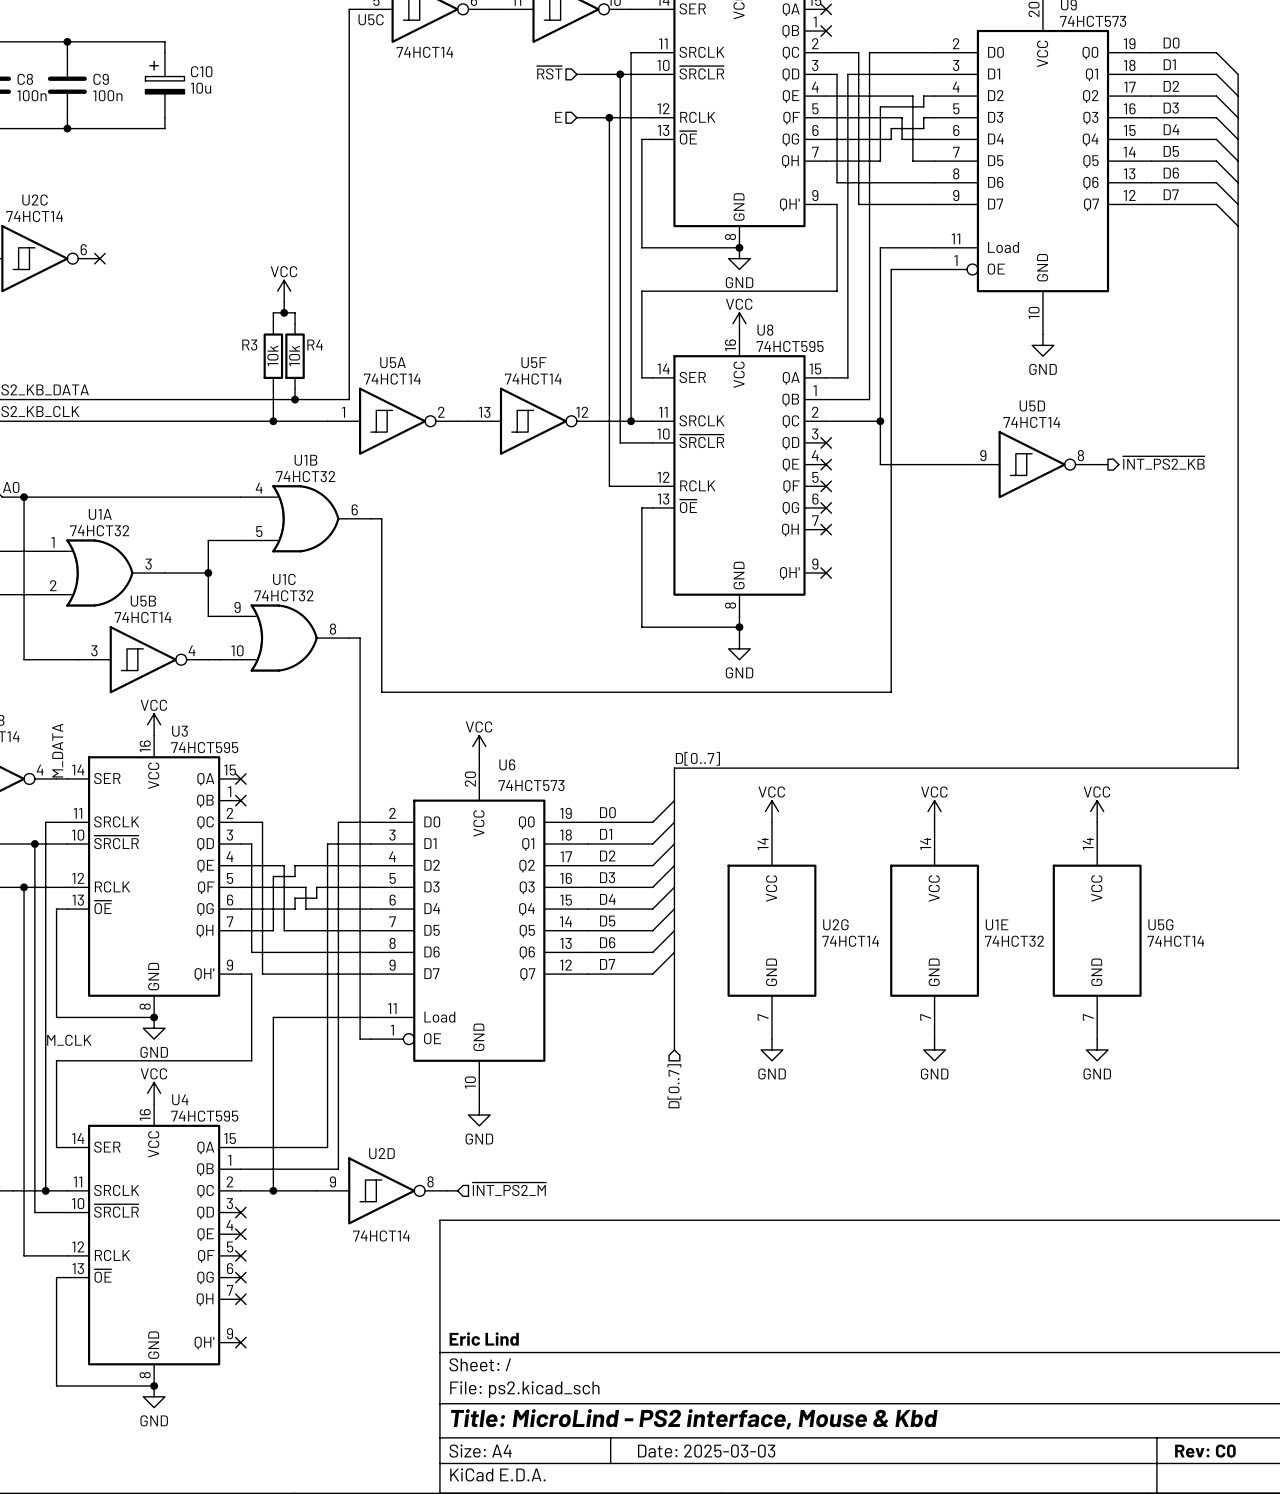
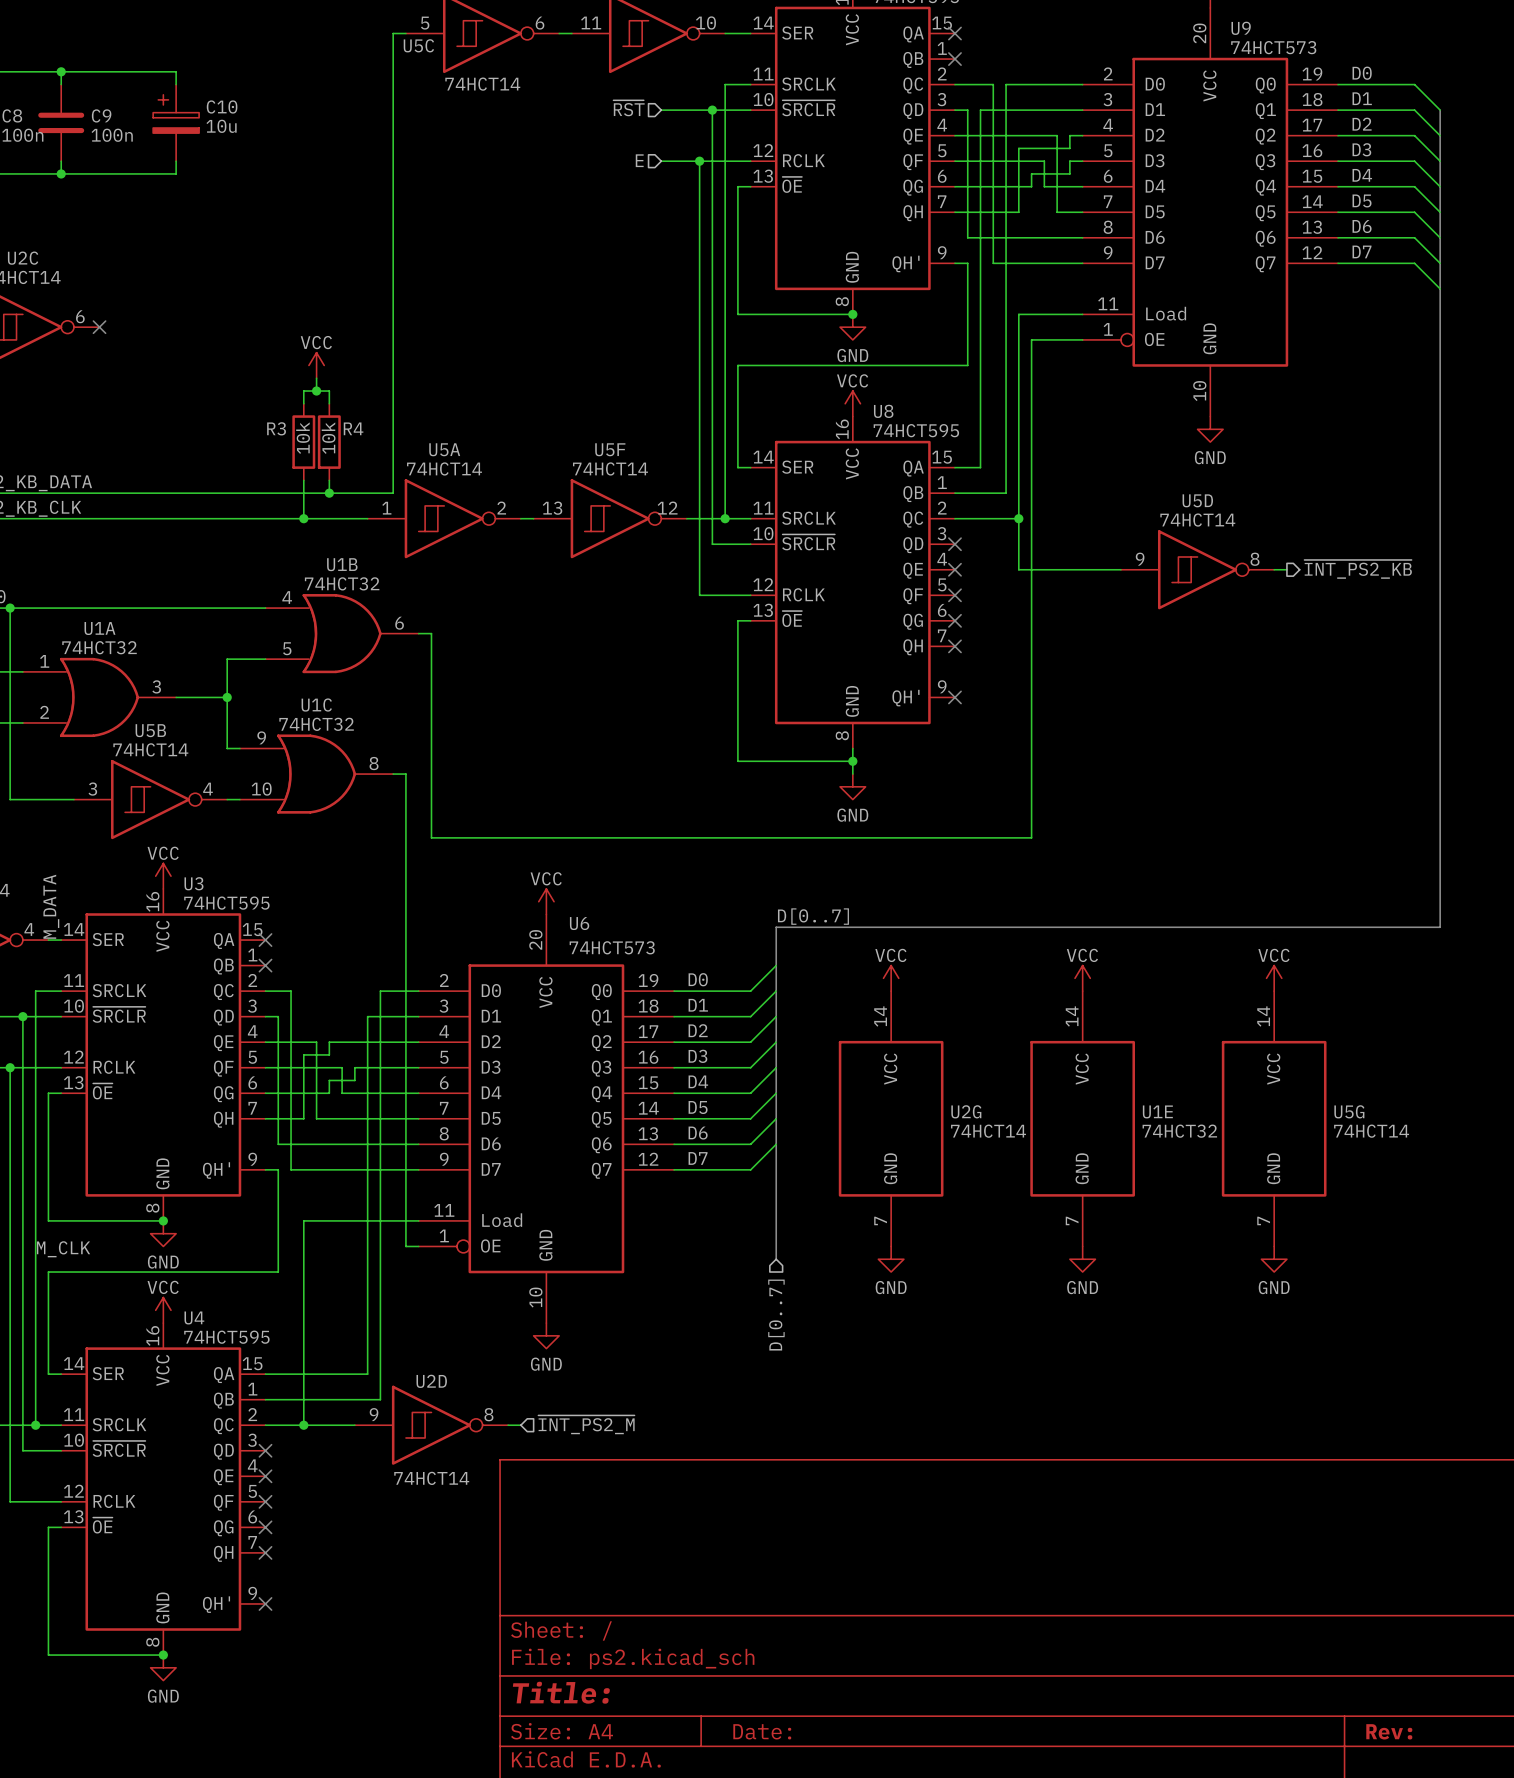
title block: Eric Lind (484, 1339) -> none
title block: Title: MicroLind - PS2 interface, Mouse & Kbd (694, 1419) -> Title: (561, 1692)
title block: Date: 2025-03-03 (706, 1451) -> Date: (762, 1731)
title block: Rev: C0 (1205, 1451) -> Rev: (1389, 1731)

